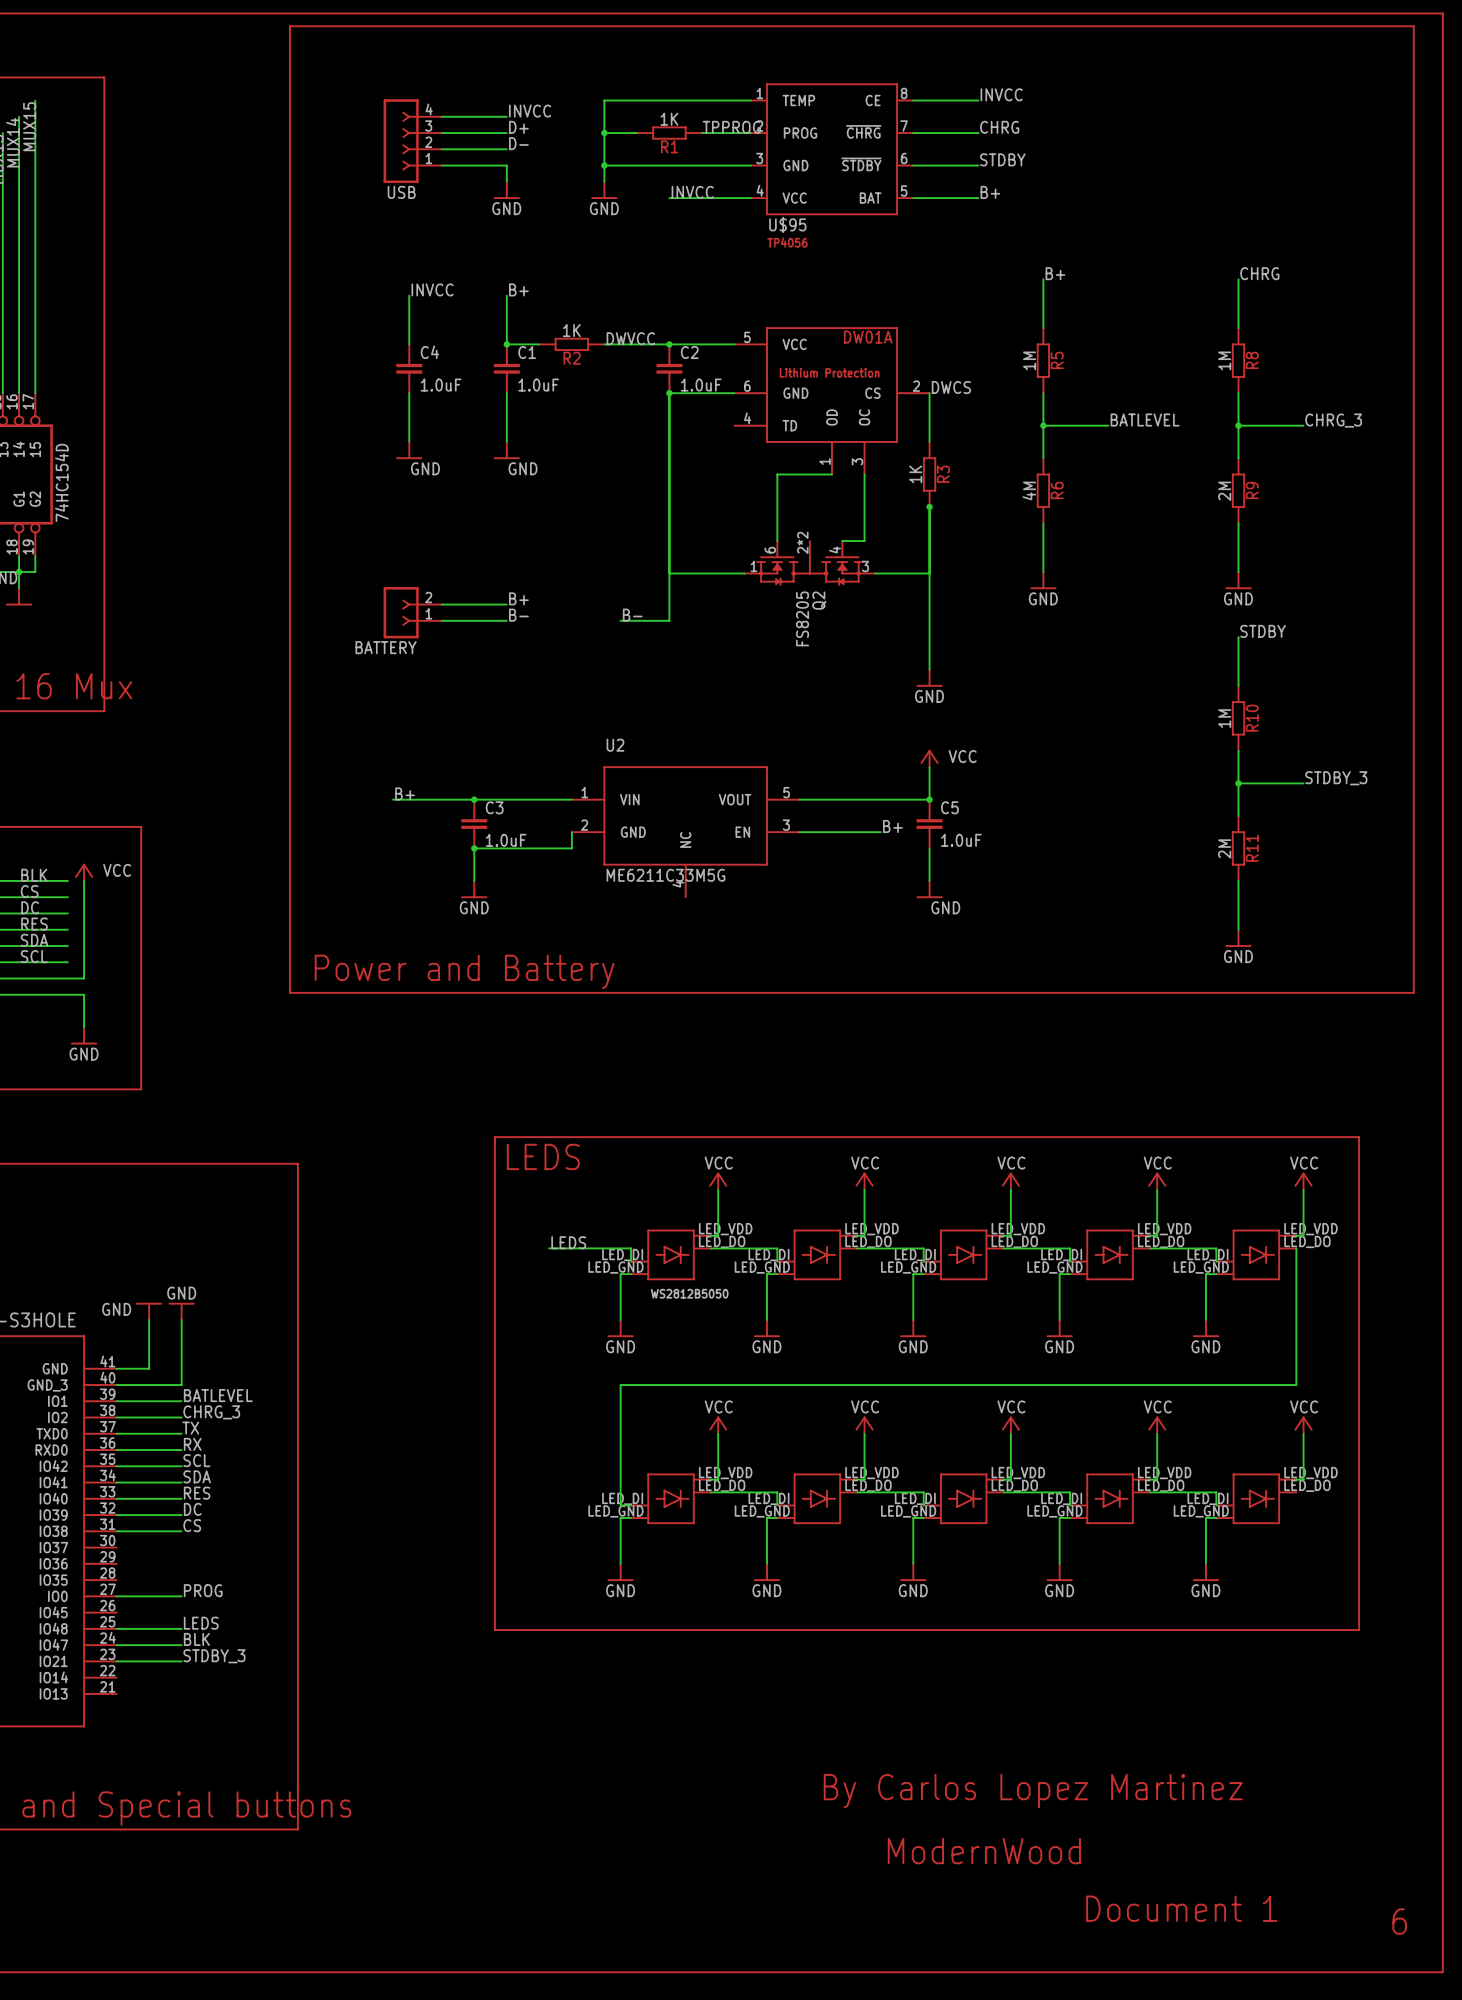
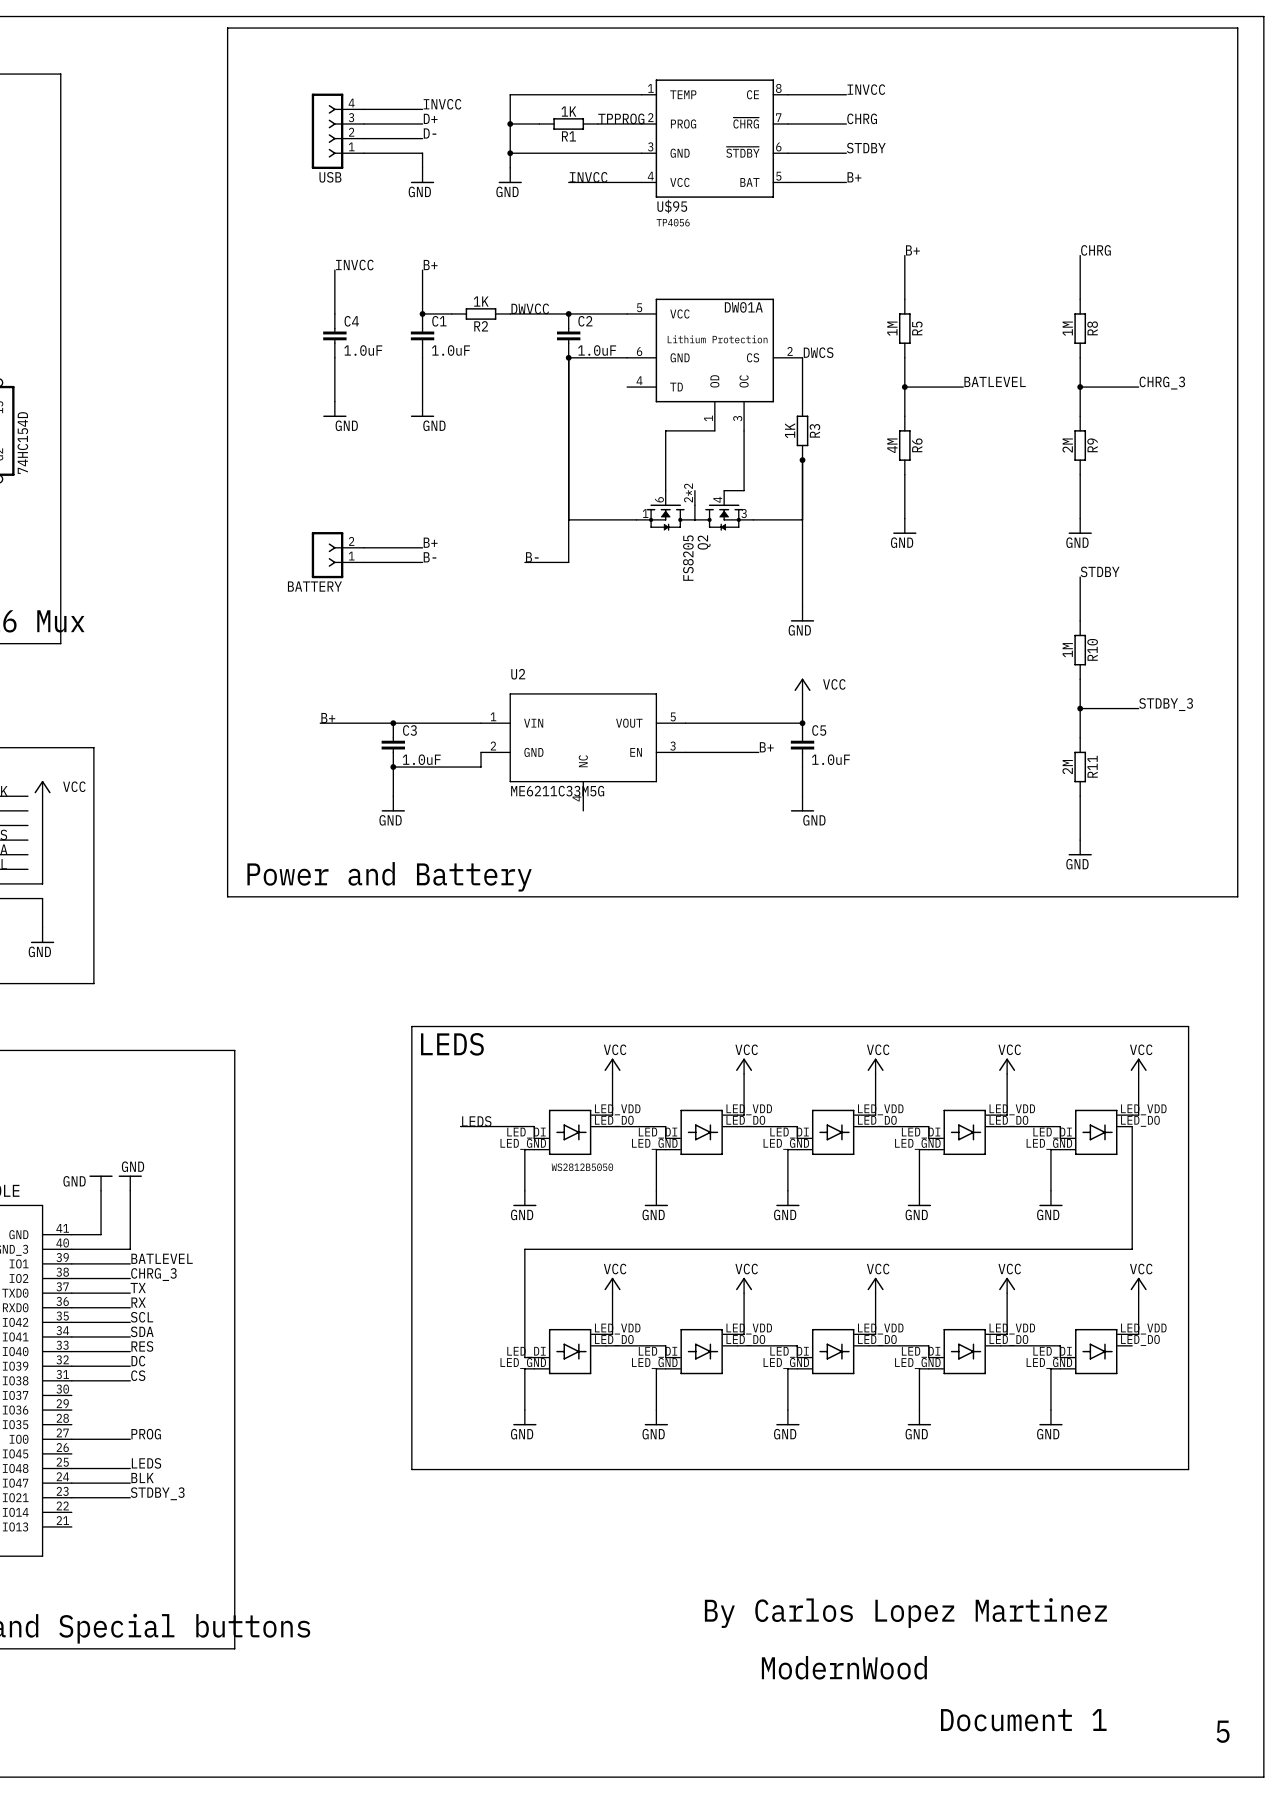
text: 6 (1399, 1921) -> 5 (1223, 1731)

